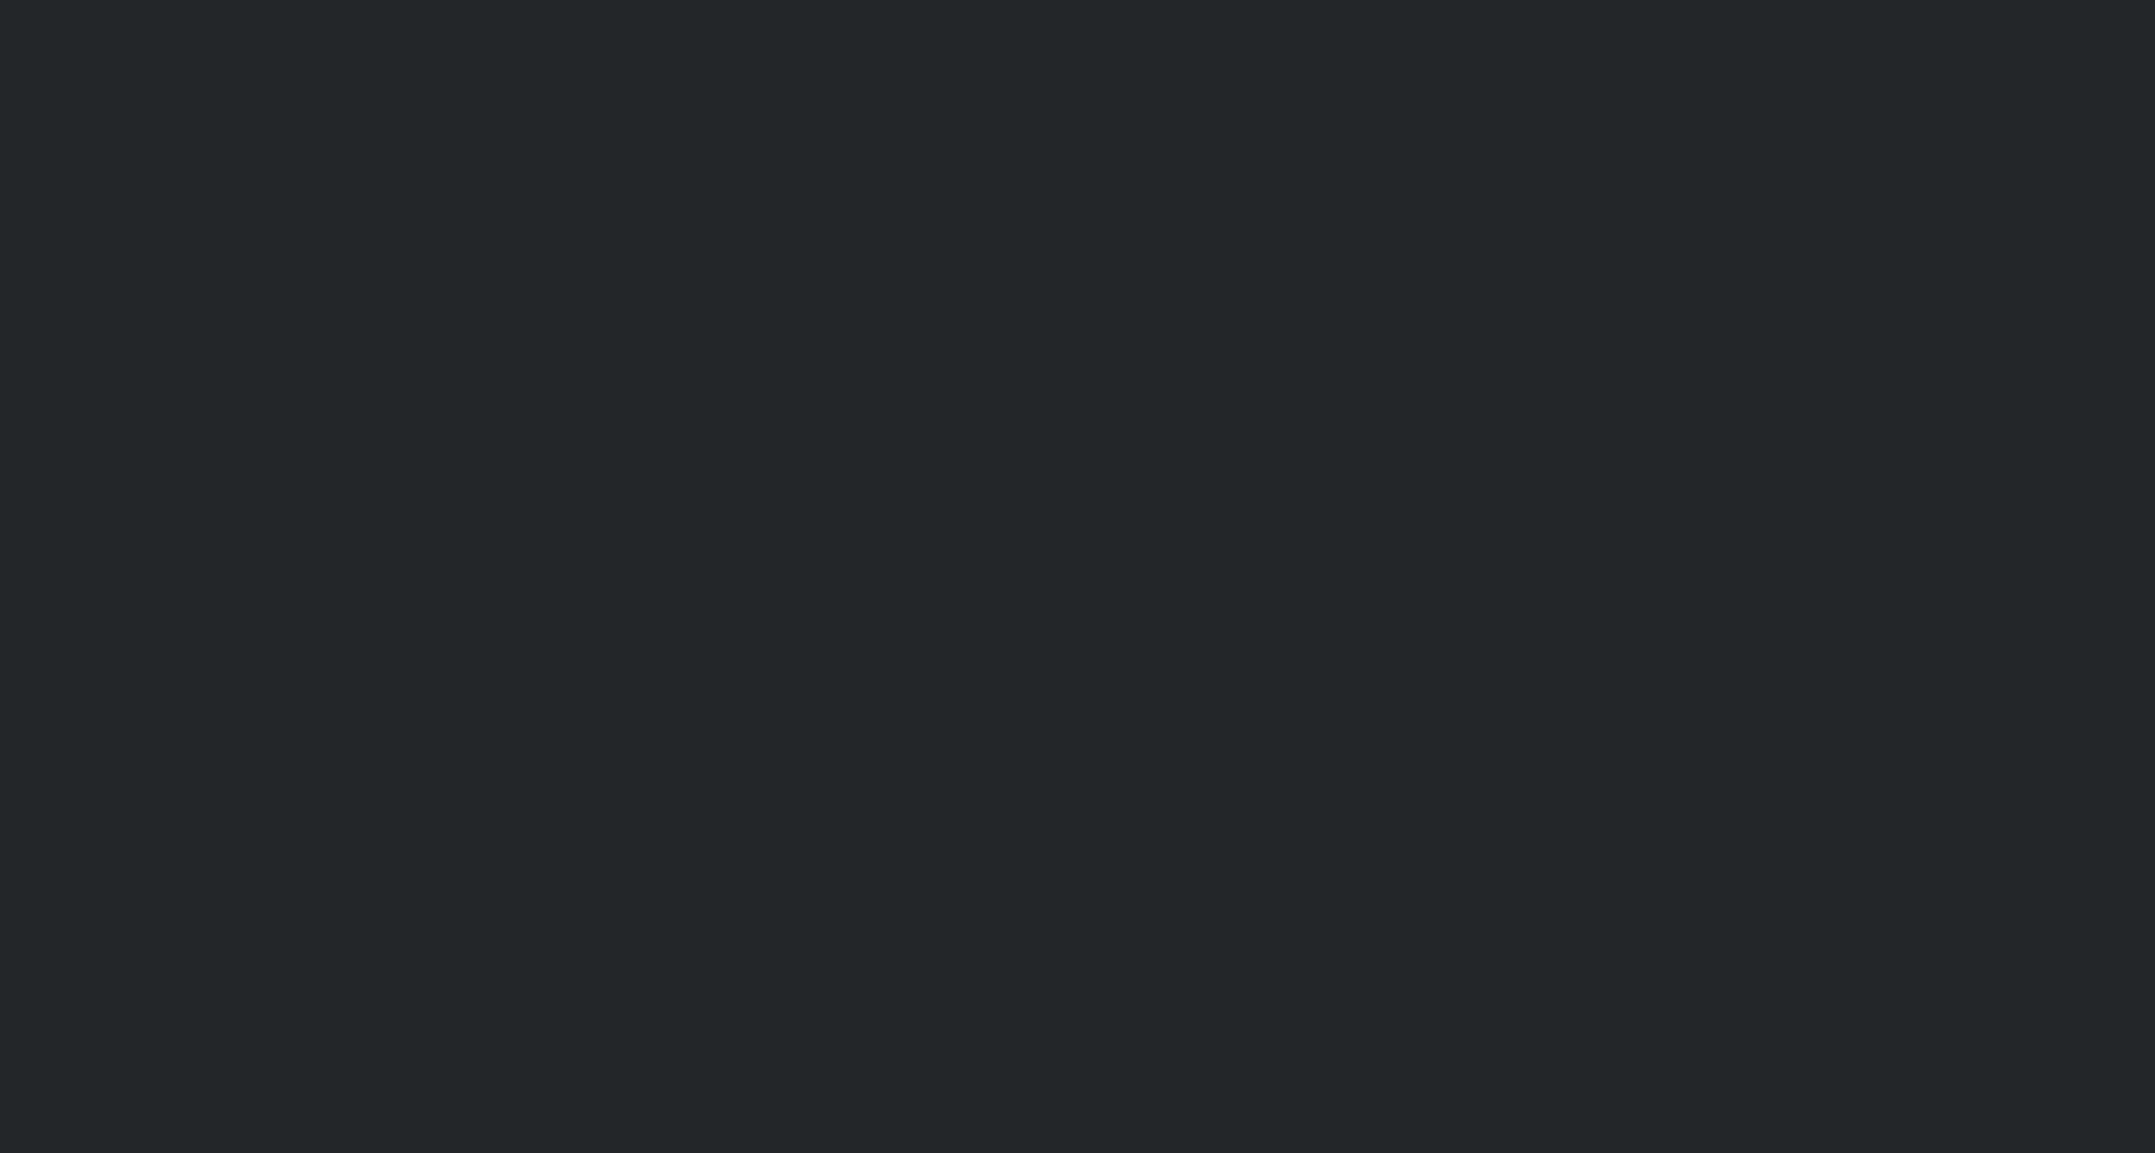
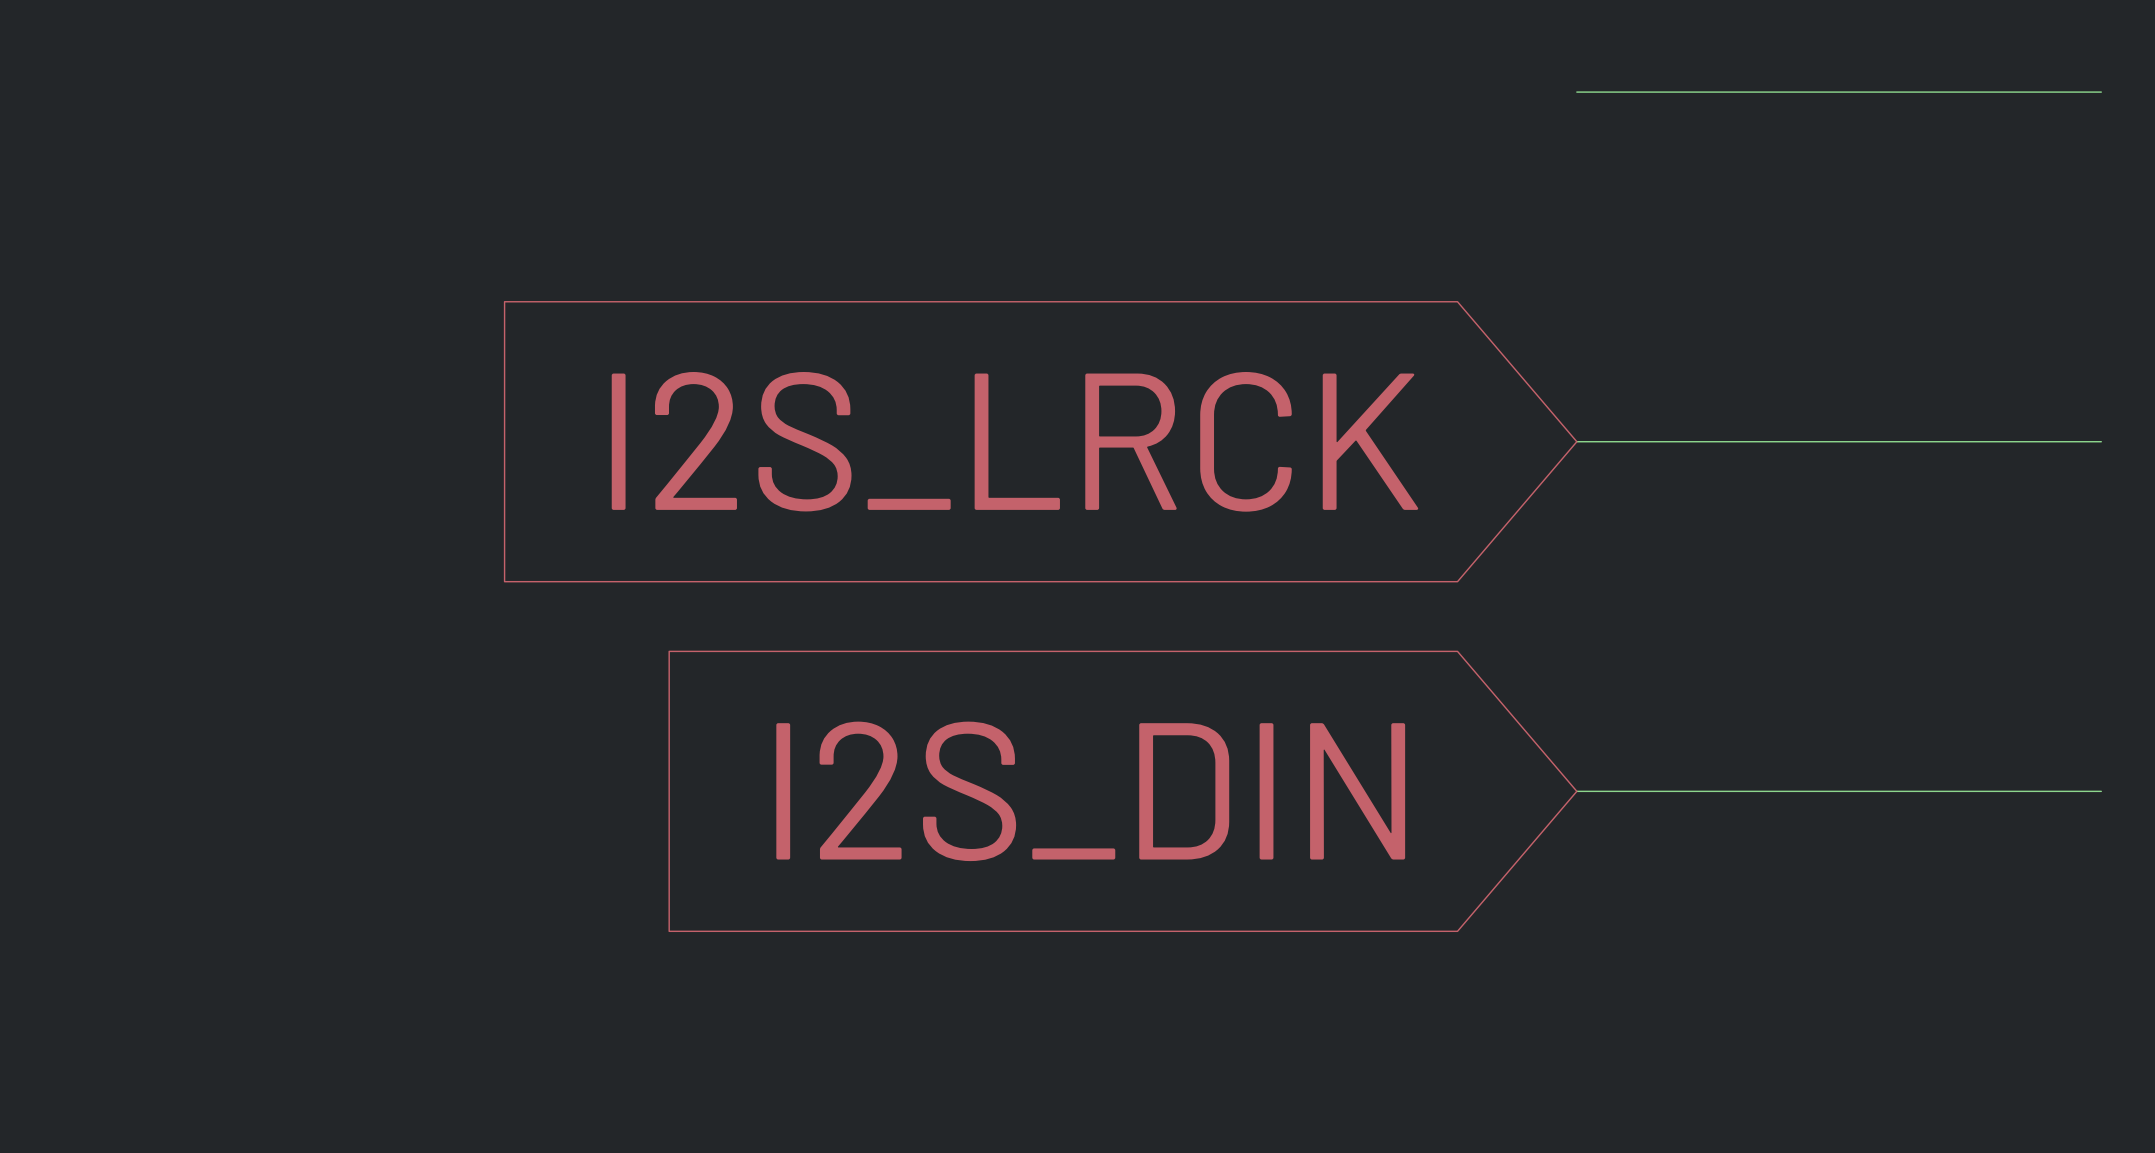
wire: none -> (1576, 92) (2101, 92)
global label: none -> I2S_LRCK (1014, 441)
wire: none -> (1576, 441) (2101, 441)
global label: none -> I2S_DIN (1090, 791)
wire: none -> (1576, 791) (2101, 791)

